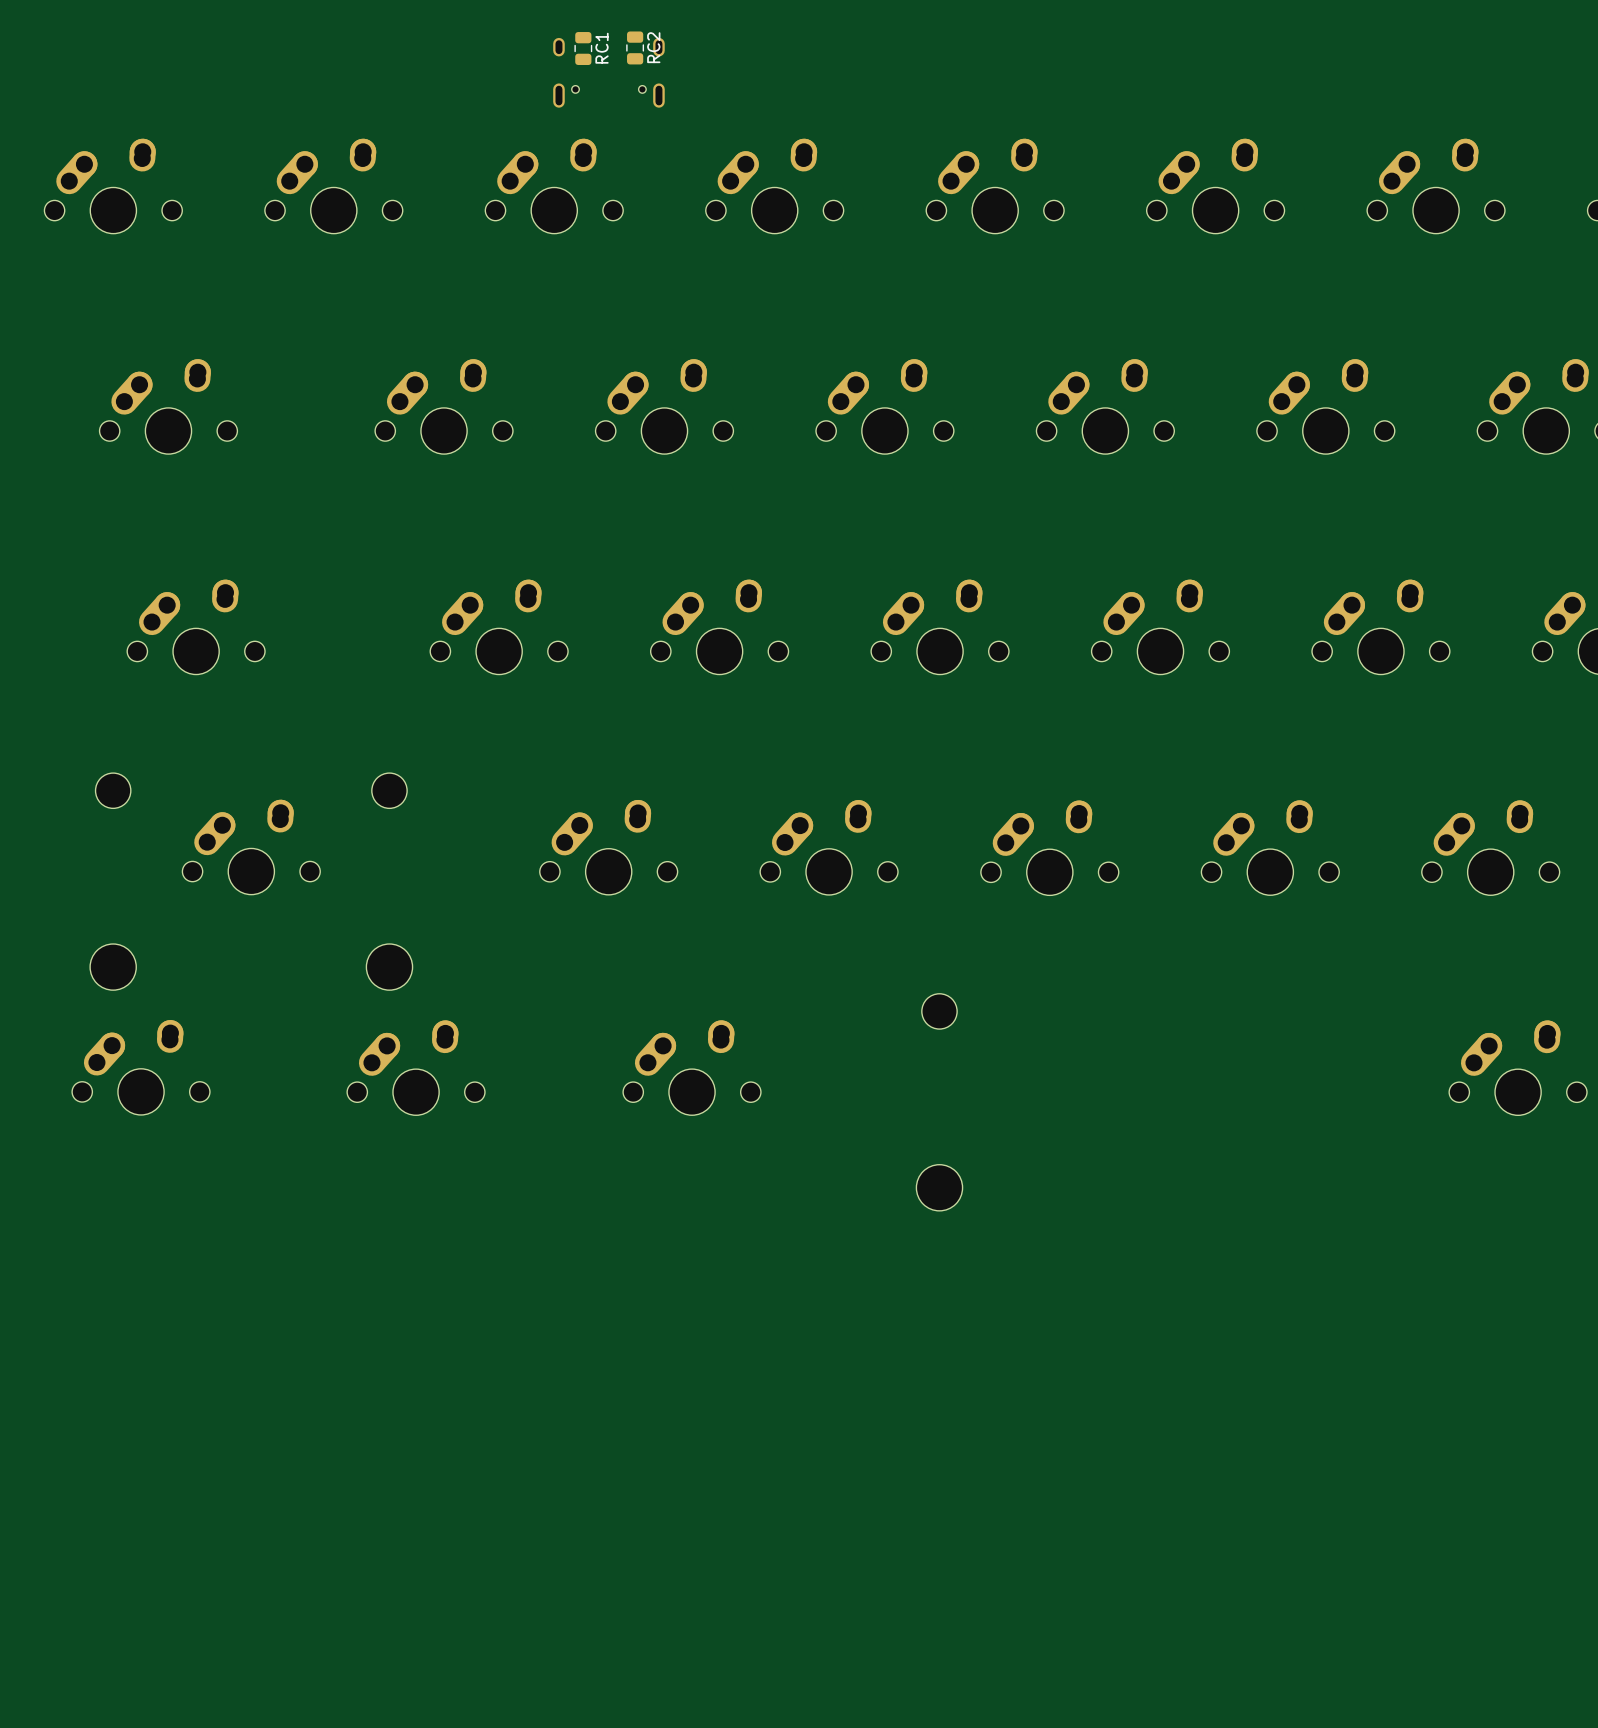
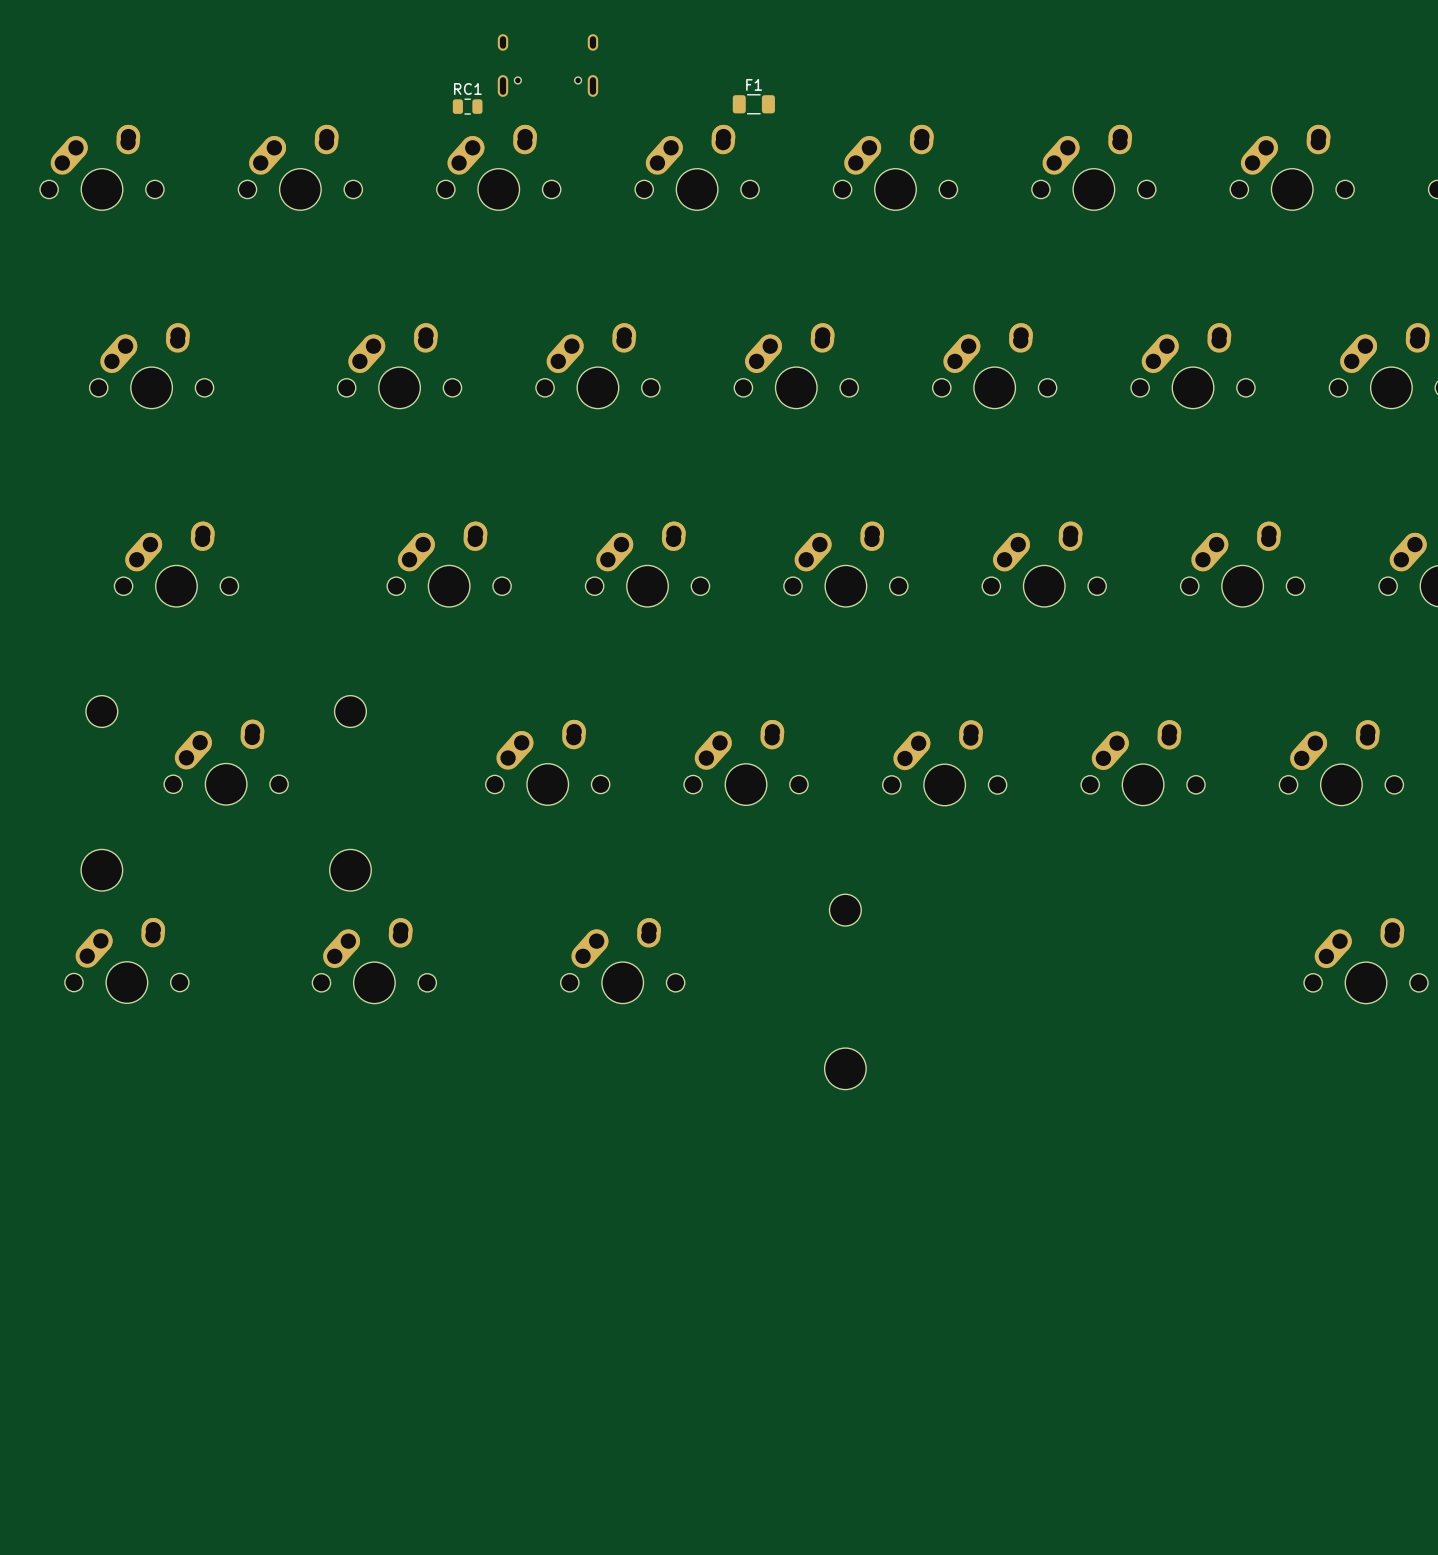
RC2: (635, 47) -> none
RC1 rotation: 0° (583, 48) -> 90° clockwise (467, 106)
RC1 position: (583, 48) -> (467, 106)
RC1 name position: RC1 (601, 48) -> RC1 (467, 89)
F1: none -> (753, 104)

